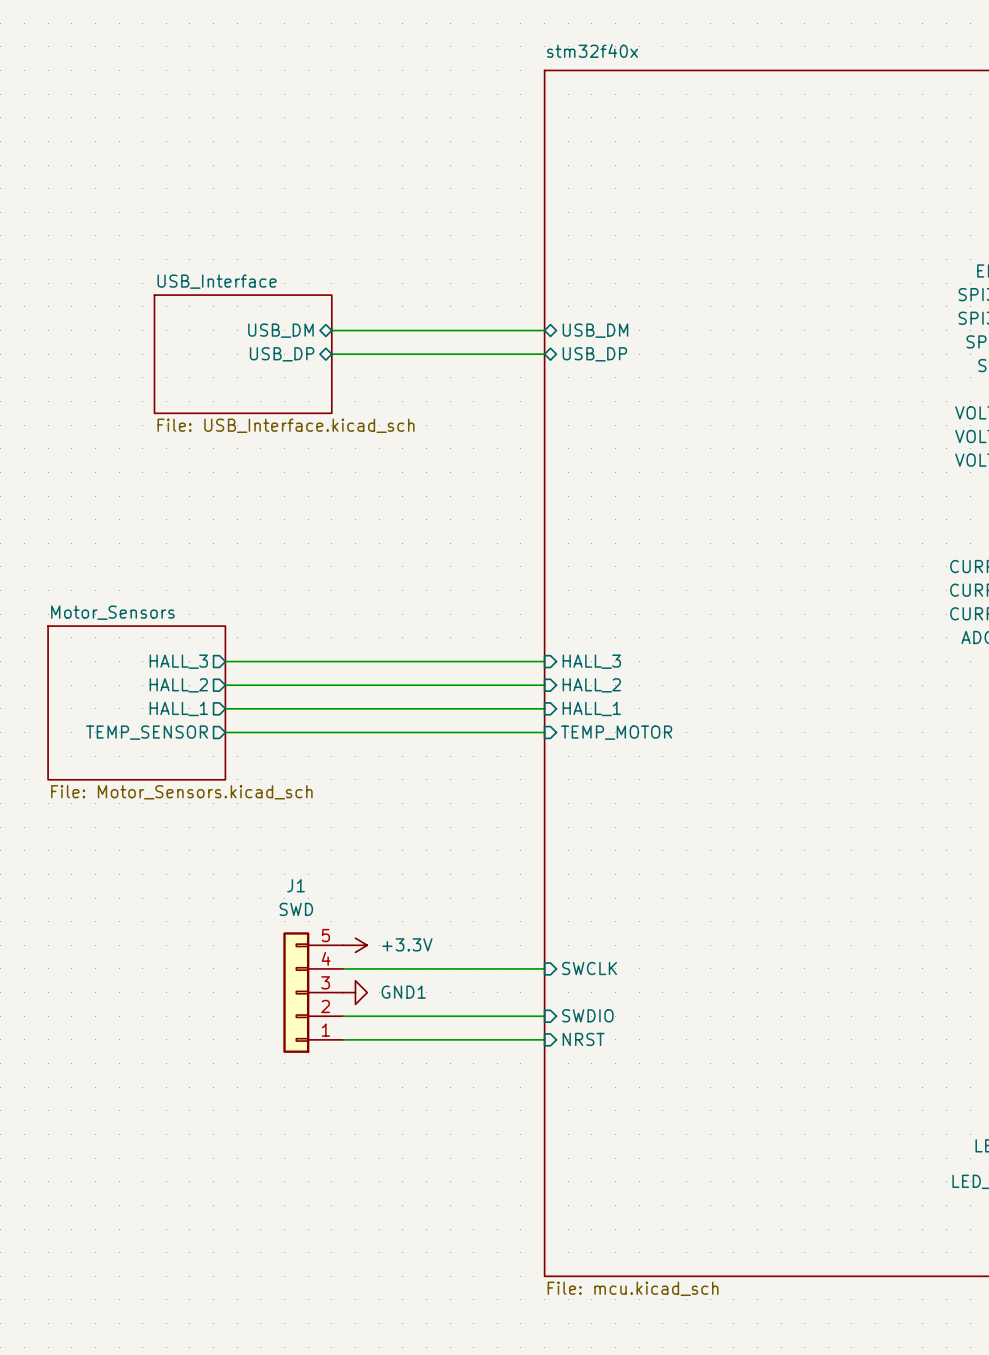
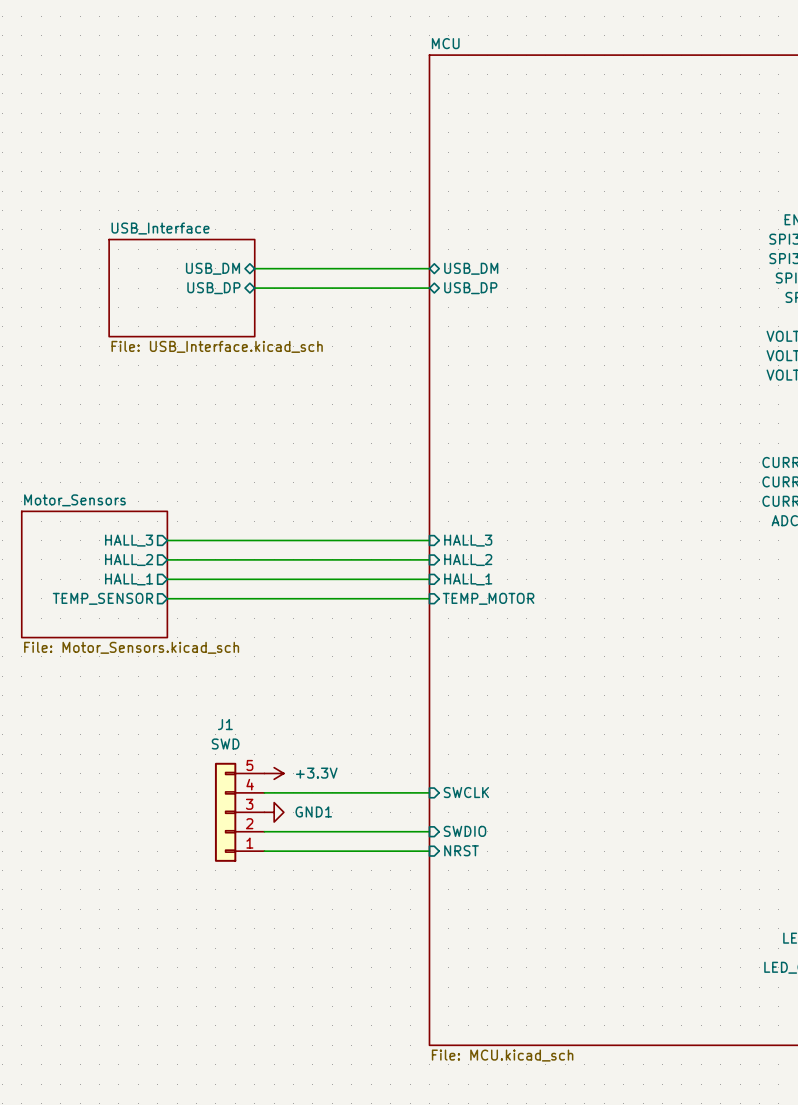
sheet stm32f40x name: stm32f40x (592, 50) -> MCU (445, 43)
sheet stm32f40x value: File: mcu.kicad_sch (633, 1288) -> File: MCU.kicad_sch (502, 1055)

